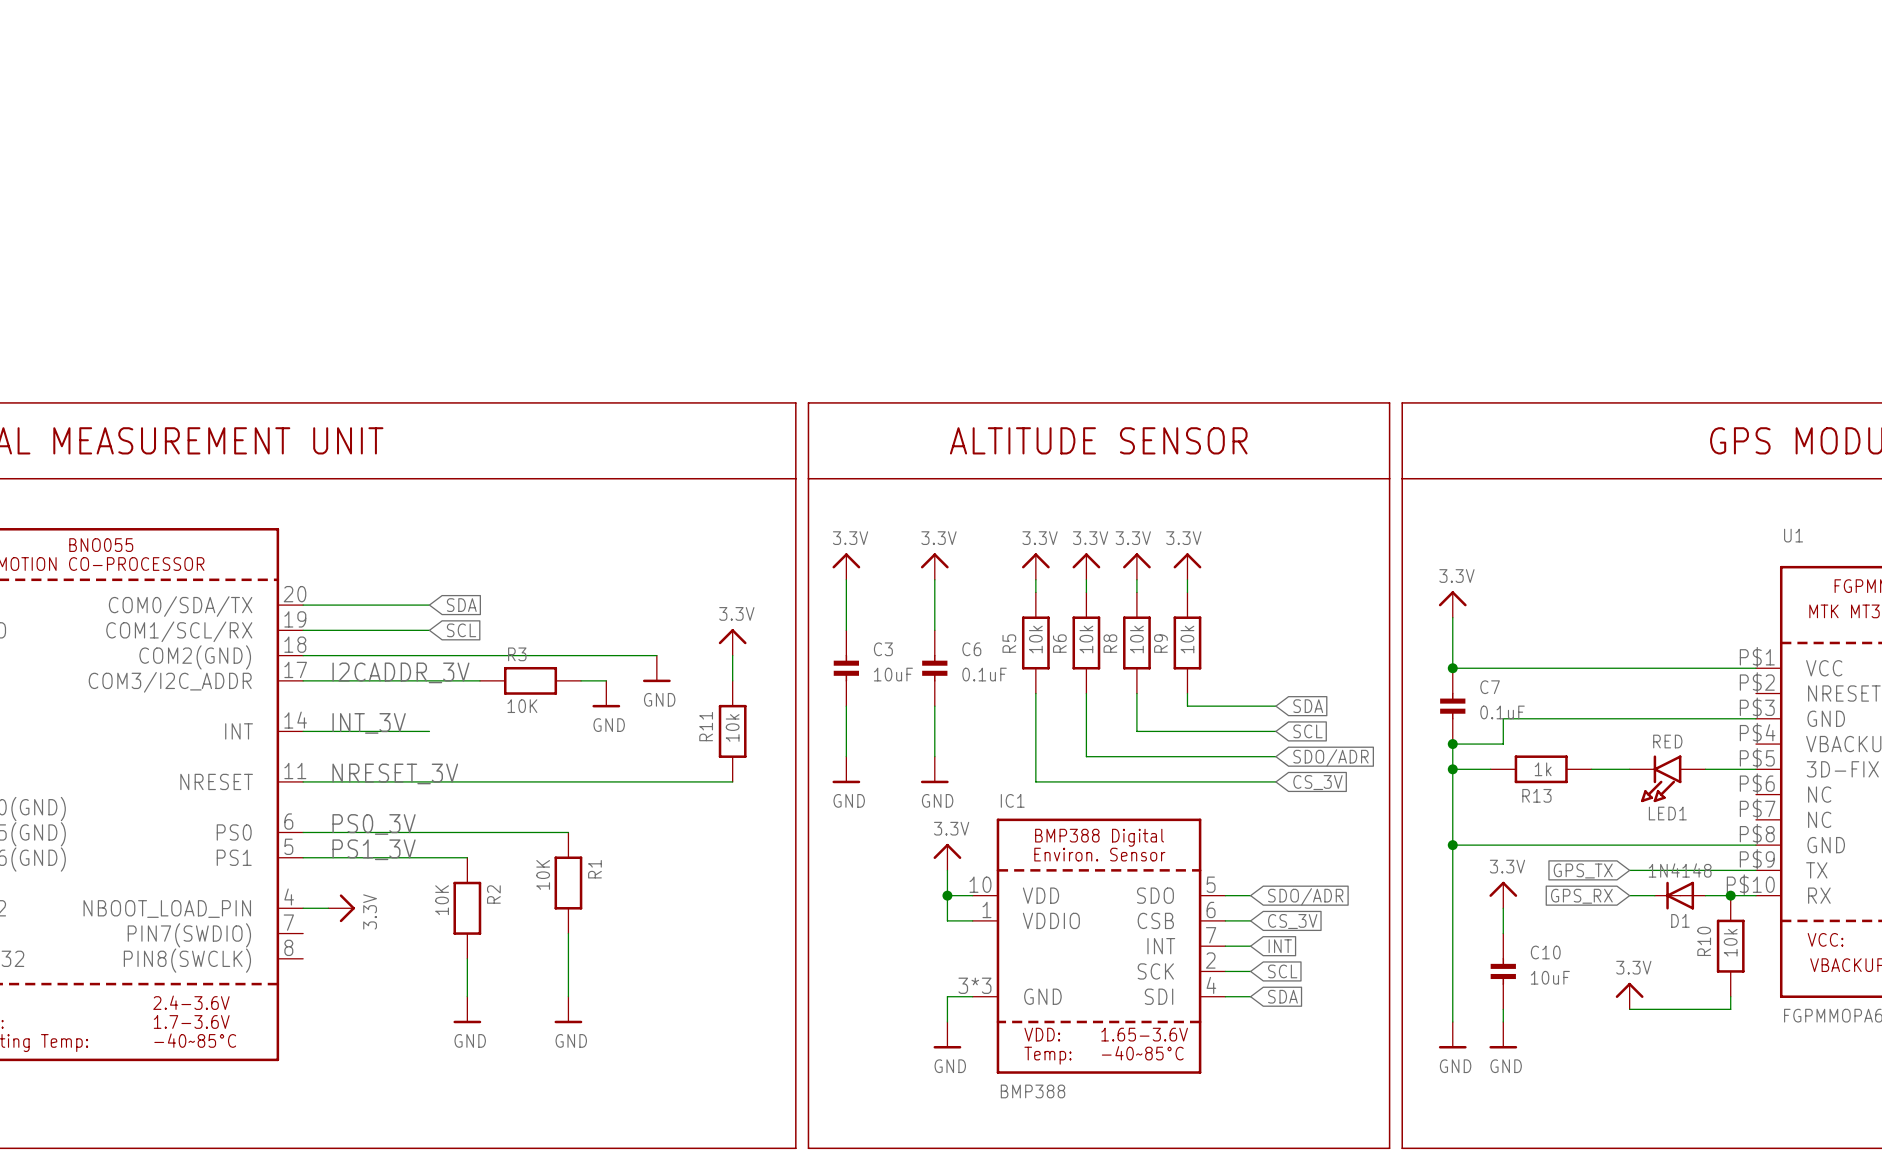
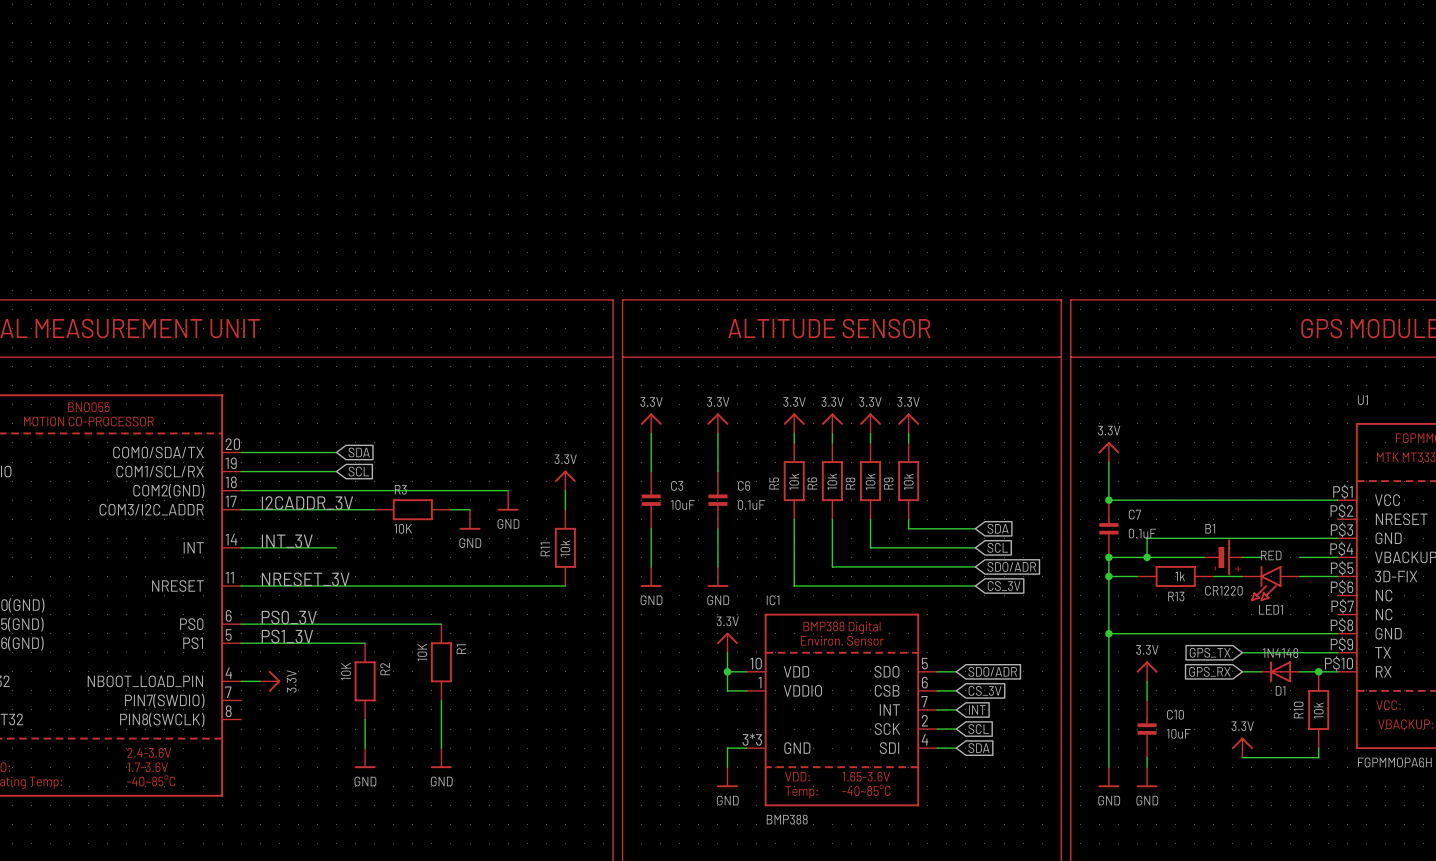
wire: none -> (1147, 557) (1204, 557)
junction: none -> (1147, 557)
B1: none -> CR1220 (1223, 557)
wire: none -> (1242, 557) (1261, 557)
wire: none -> (1299, 557) (1337, 557)

